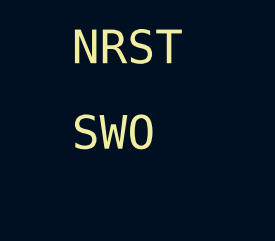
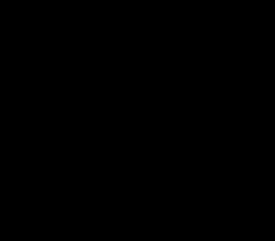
text: NRST (128, 46) -> none
text: SWO (113, 131) -> none

